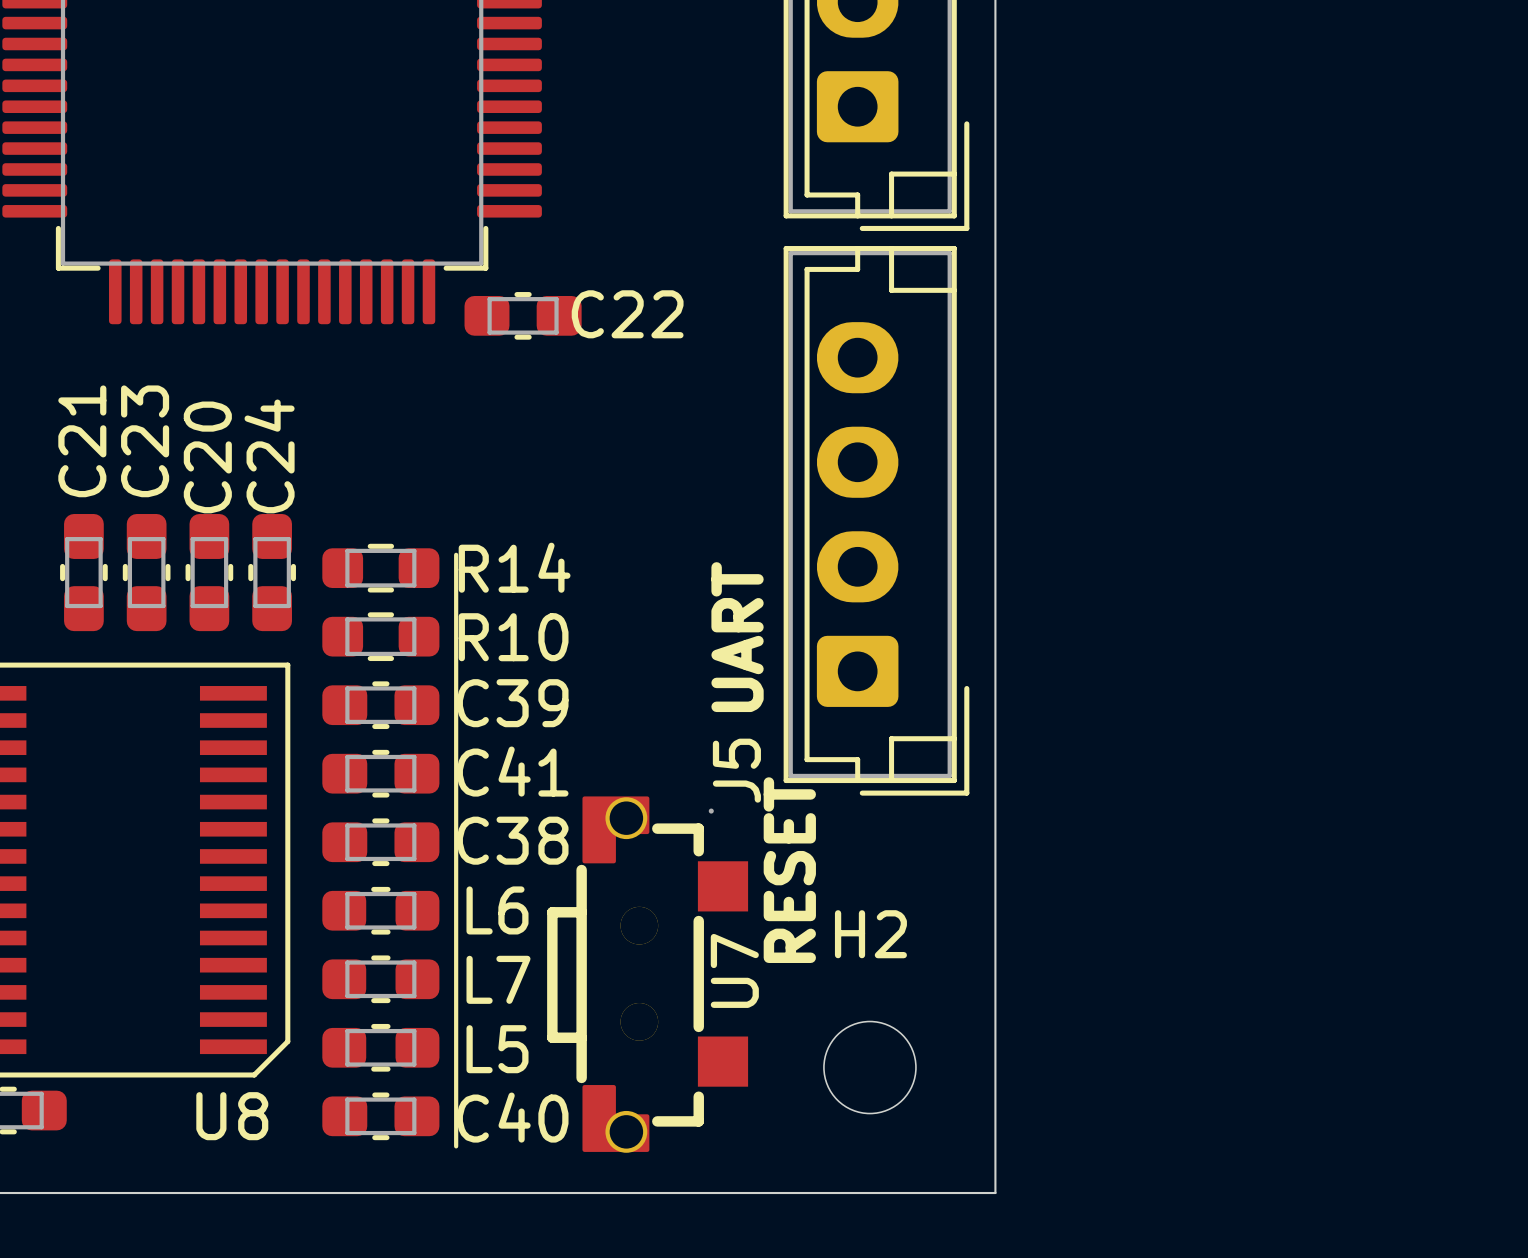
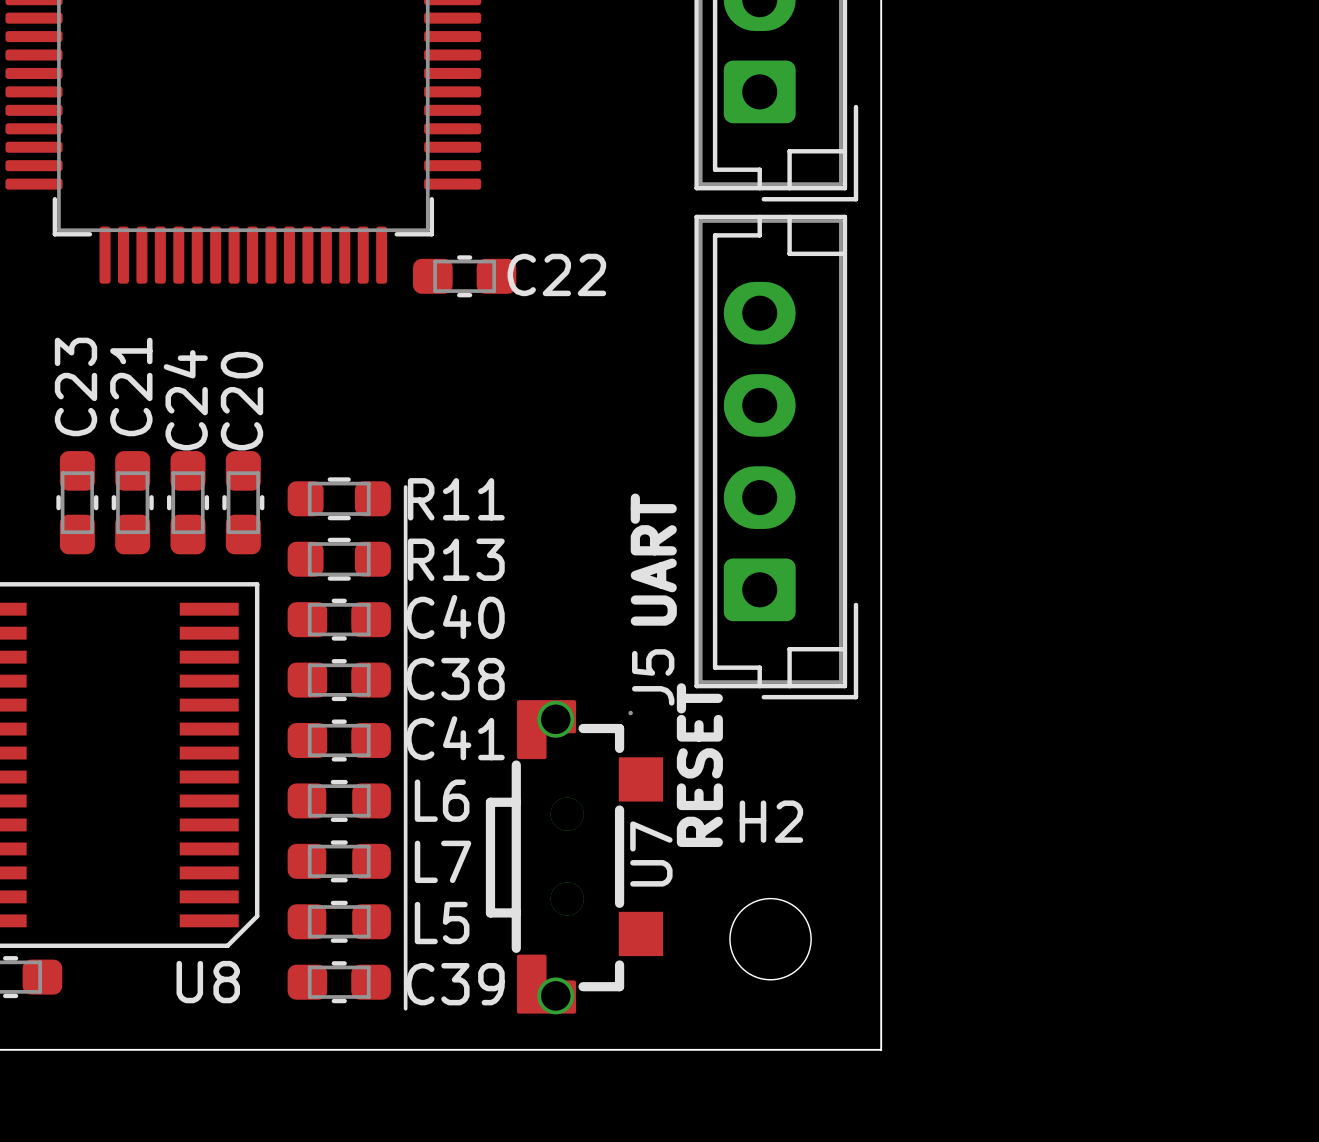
C21 name: C21 (82, 441) -> C23 (76, 386)
C23 name: C23 (145, 441) -> C21 (131, 386)
C24 name: C24 (269, 456) -> C20 (241, 401)
C20 name: C20 (207, 457) -> C24 (185, 400)
R14 name: R14 (514, 567) -> R11 (456, 499)
R10 name: R10 (513, 637) -> R13 (456, 559)
C39 name: C39 (512, 703) -> C40 (455, 617)
C41 name: C41 (512, 771) -> C38 (455, 679)
C38 name: C38 (512, 840) -> C41 (455, 738)
C40 name: C40 (512, 1117) -> C39 (455, 984)

